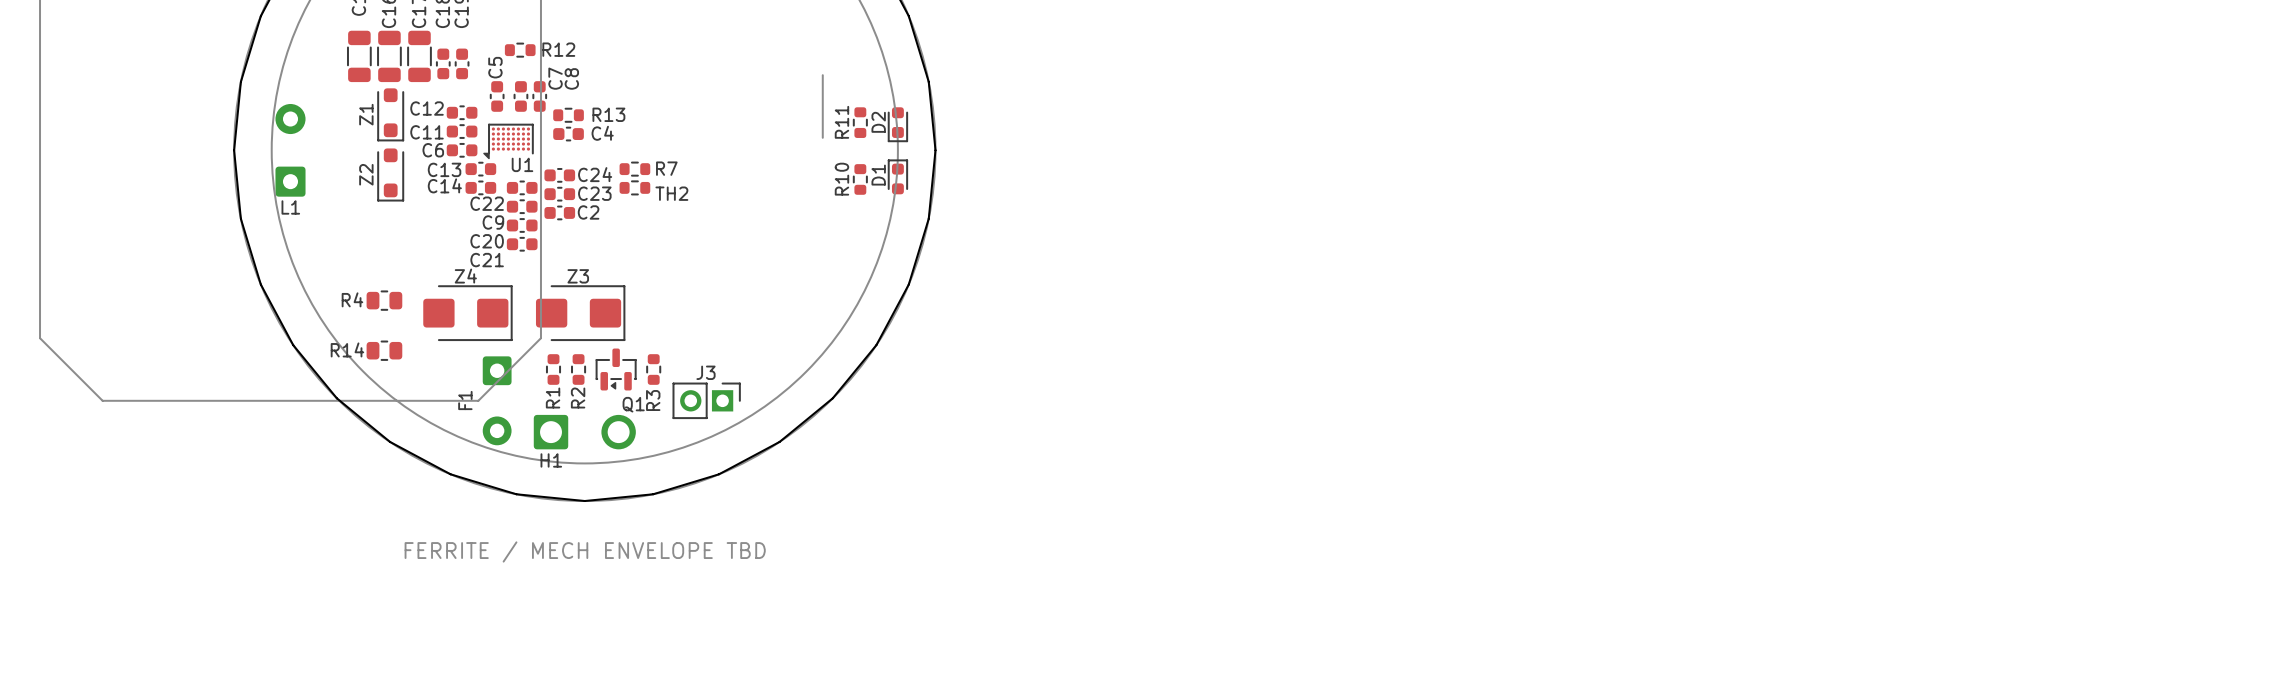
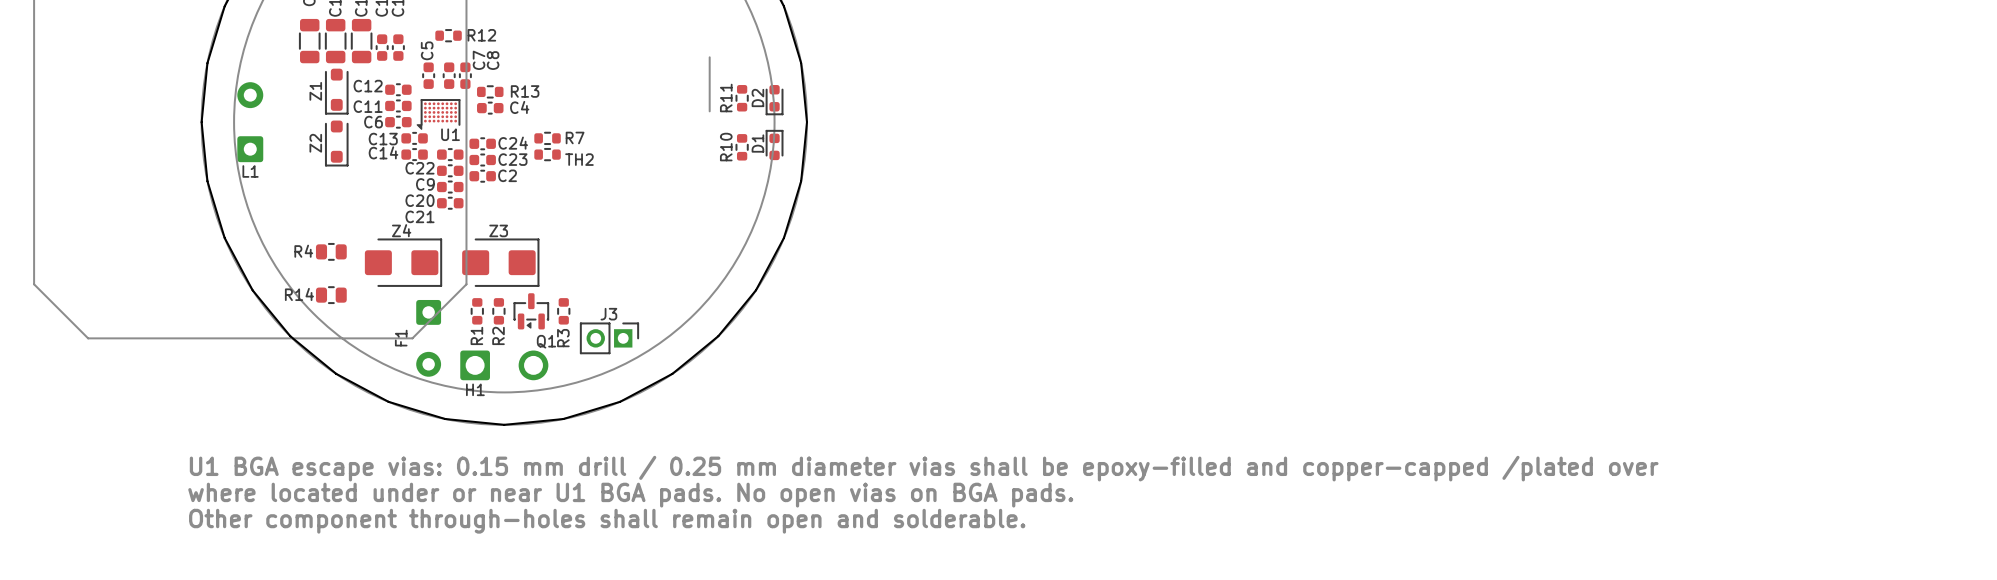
text: FERRITE / MECH ENVELOPE TBD (585, 551) -> none
text: none -> U1 BGA escape vias: 0.15 mm drill / 0.25 mm diameter vias shall be epoxy-filled and copper-capped /plated over (924, 468)
text: none -> where located under or near U1 BGA pads. No open vias on BGA pads. (630, 495)
text: none -> Other component through-holes shall remain open and solderable. (607, 521)

